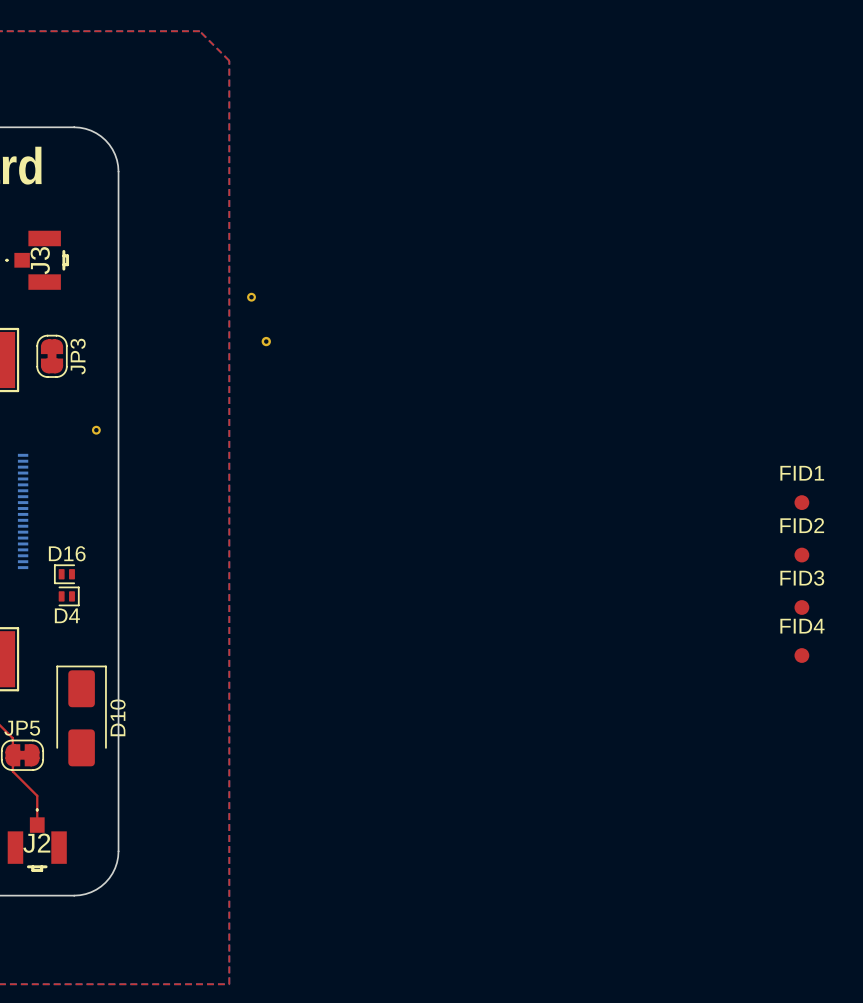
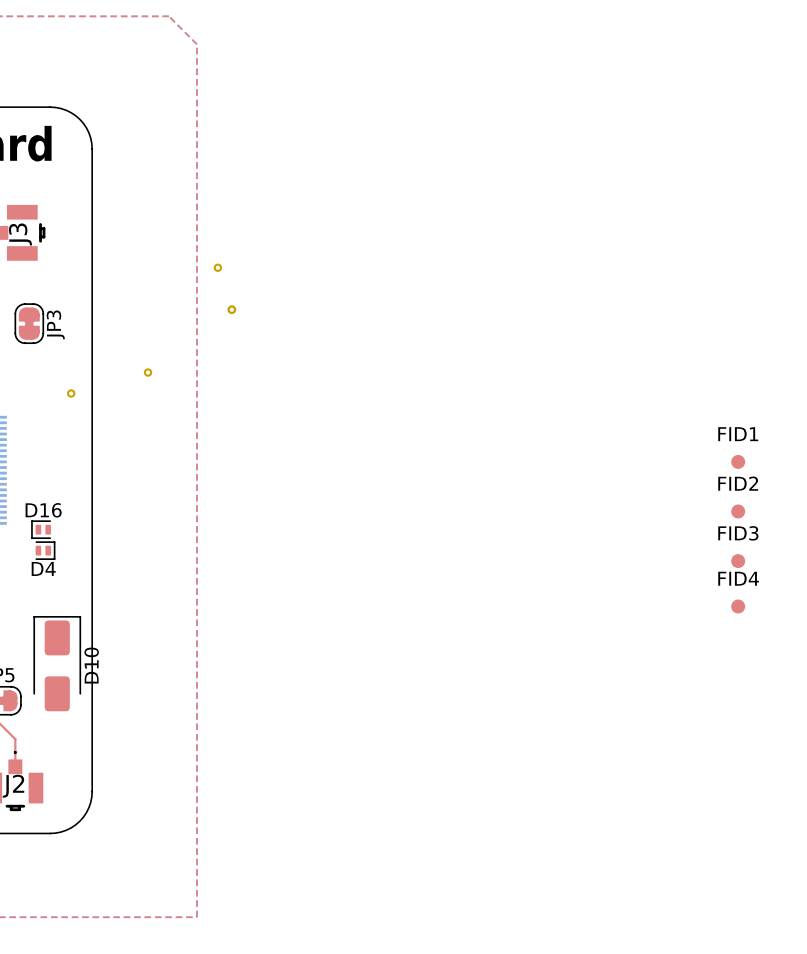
part: none -> (148, 372)

